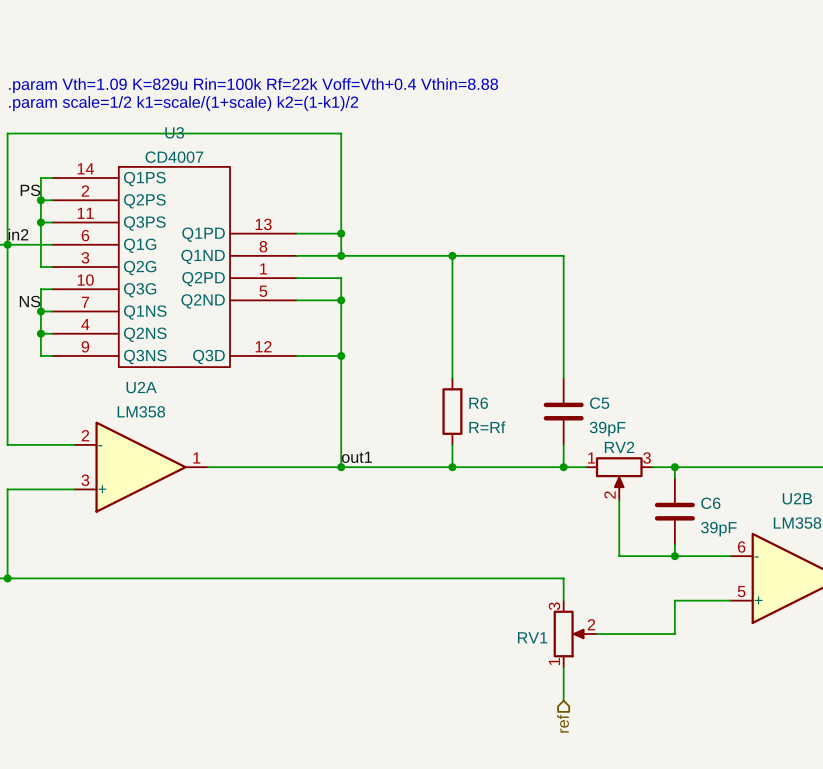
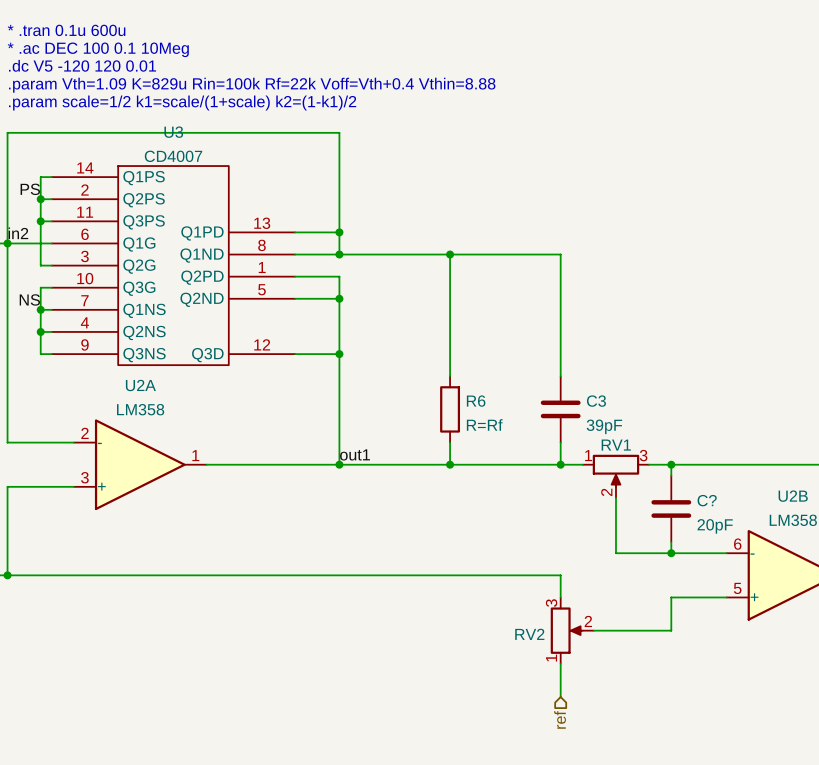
text: none -> * .tran 0.1u 600u (66, 30)
text: none -> * .ac DEC 100 0.1 10Meg (98, 49)
text: none -> .dc V5 -120 120 0.01 (82, 65)
C5 name: C5 (599, 403) -> C3 (596, 401)
RV2 name: RV2 (619, 447) -> RV1 (616, 445)
C6 name: C6 (710, 503) -> C? (707, 500)
C6 value: 39pF (718, 529) -> 20pF (715, 526)
RV1 name: RV1 (532, 637) -> RV2 (529, 634)

